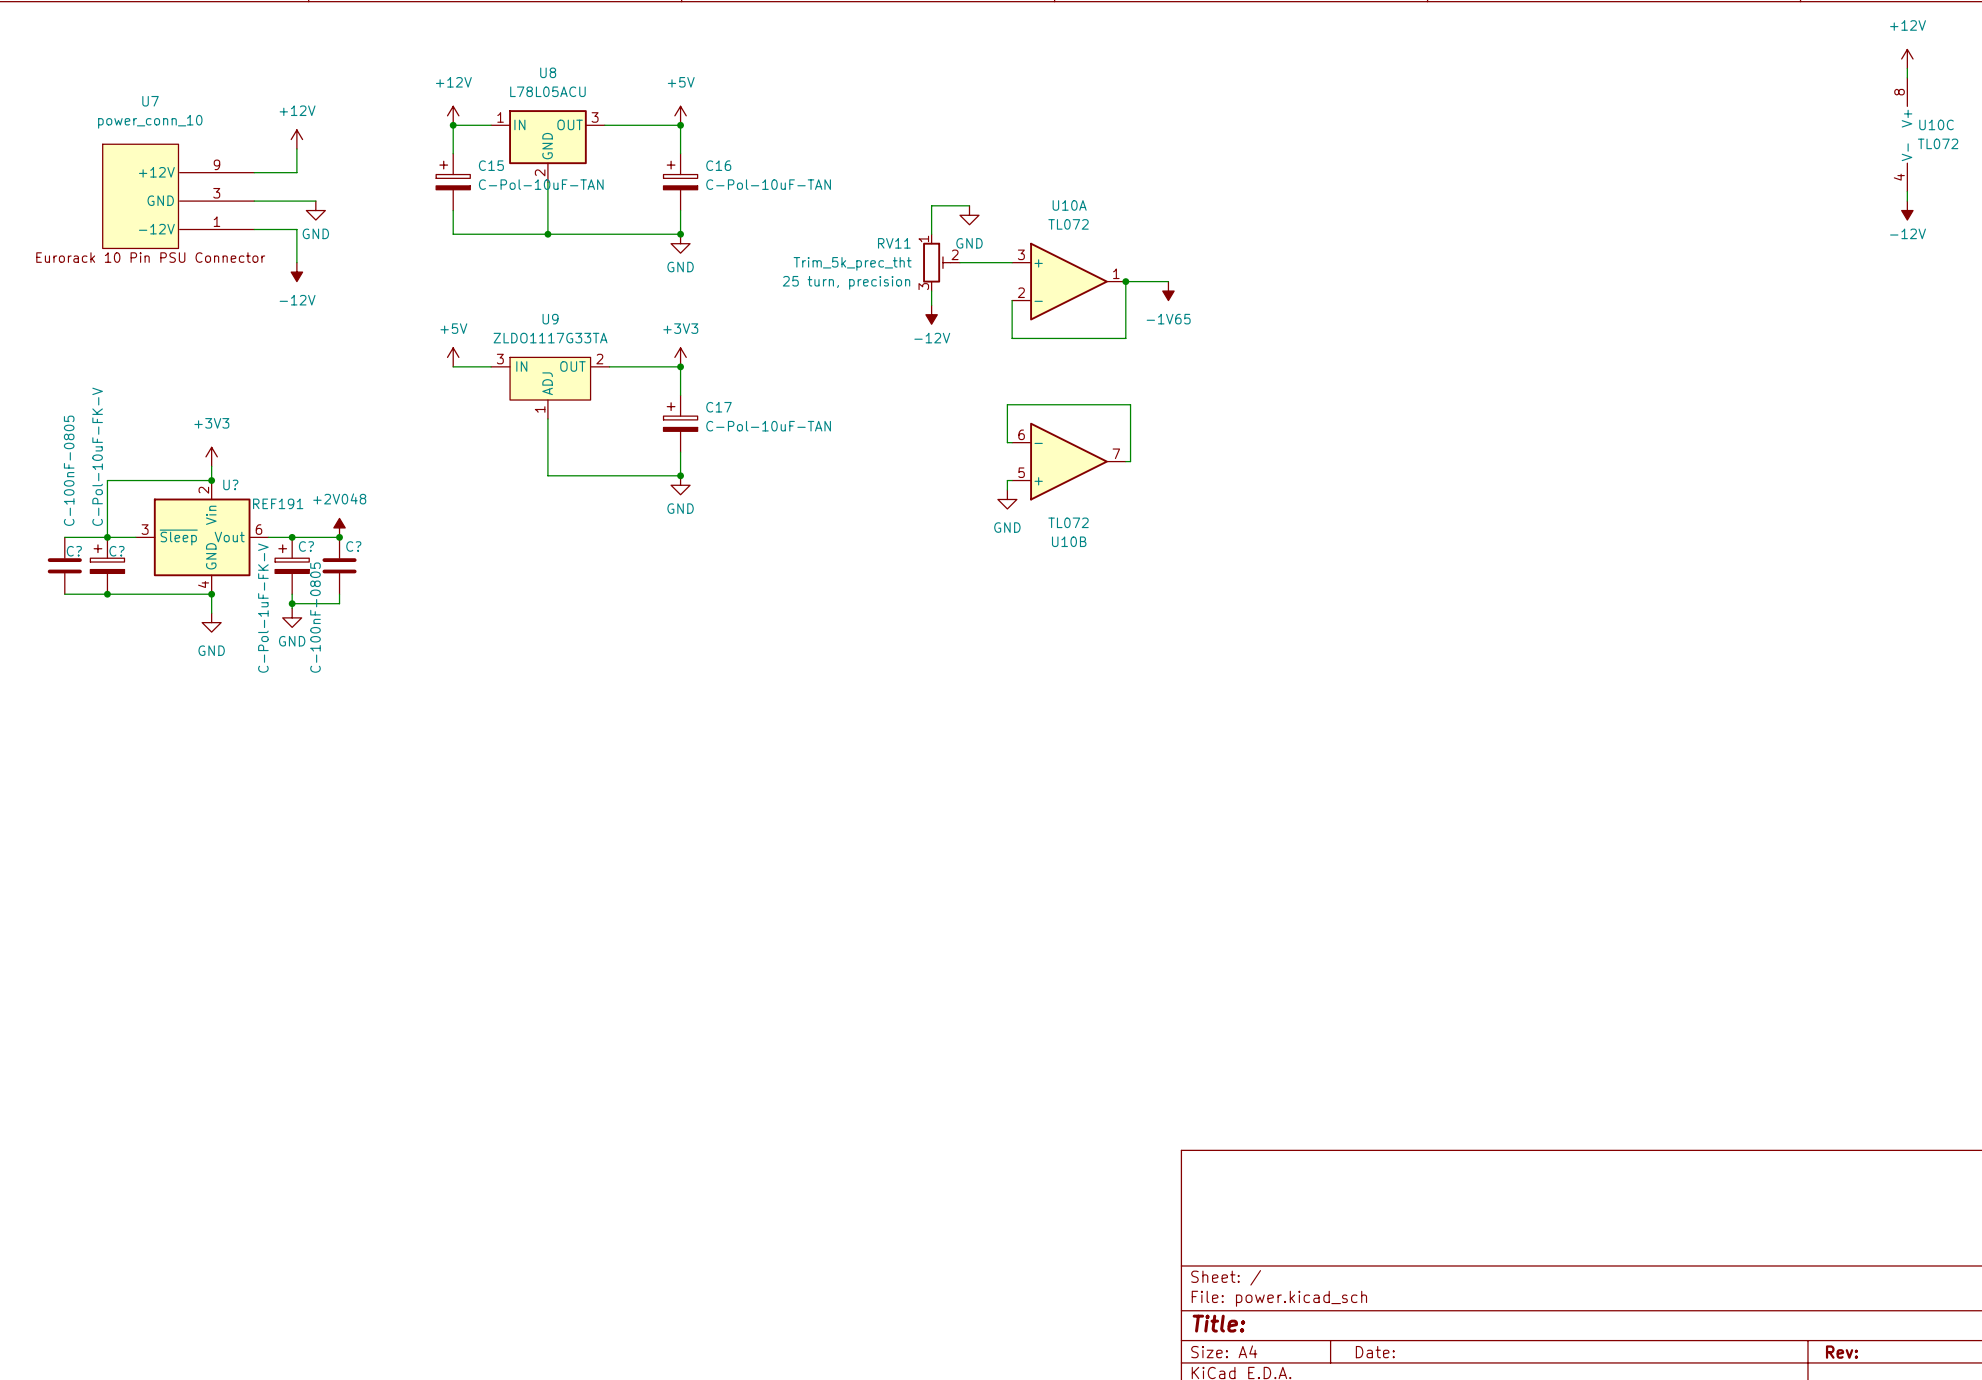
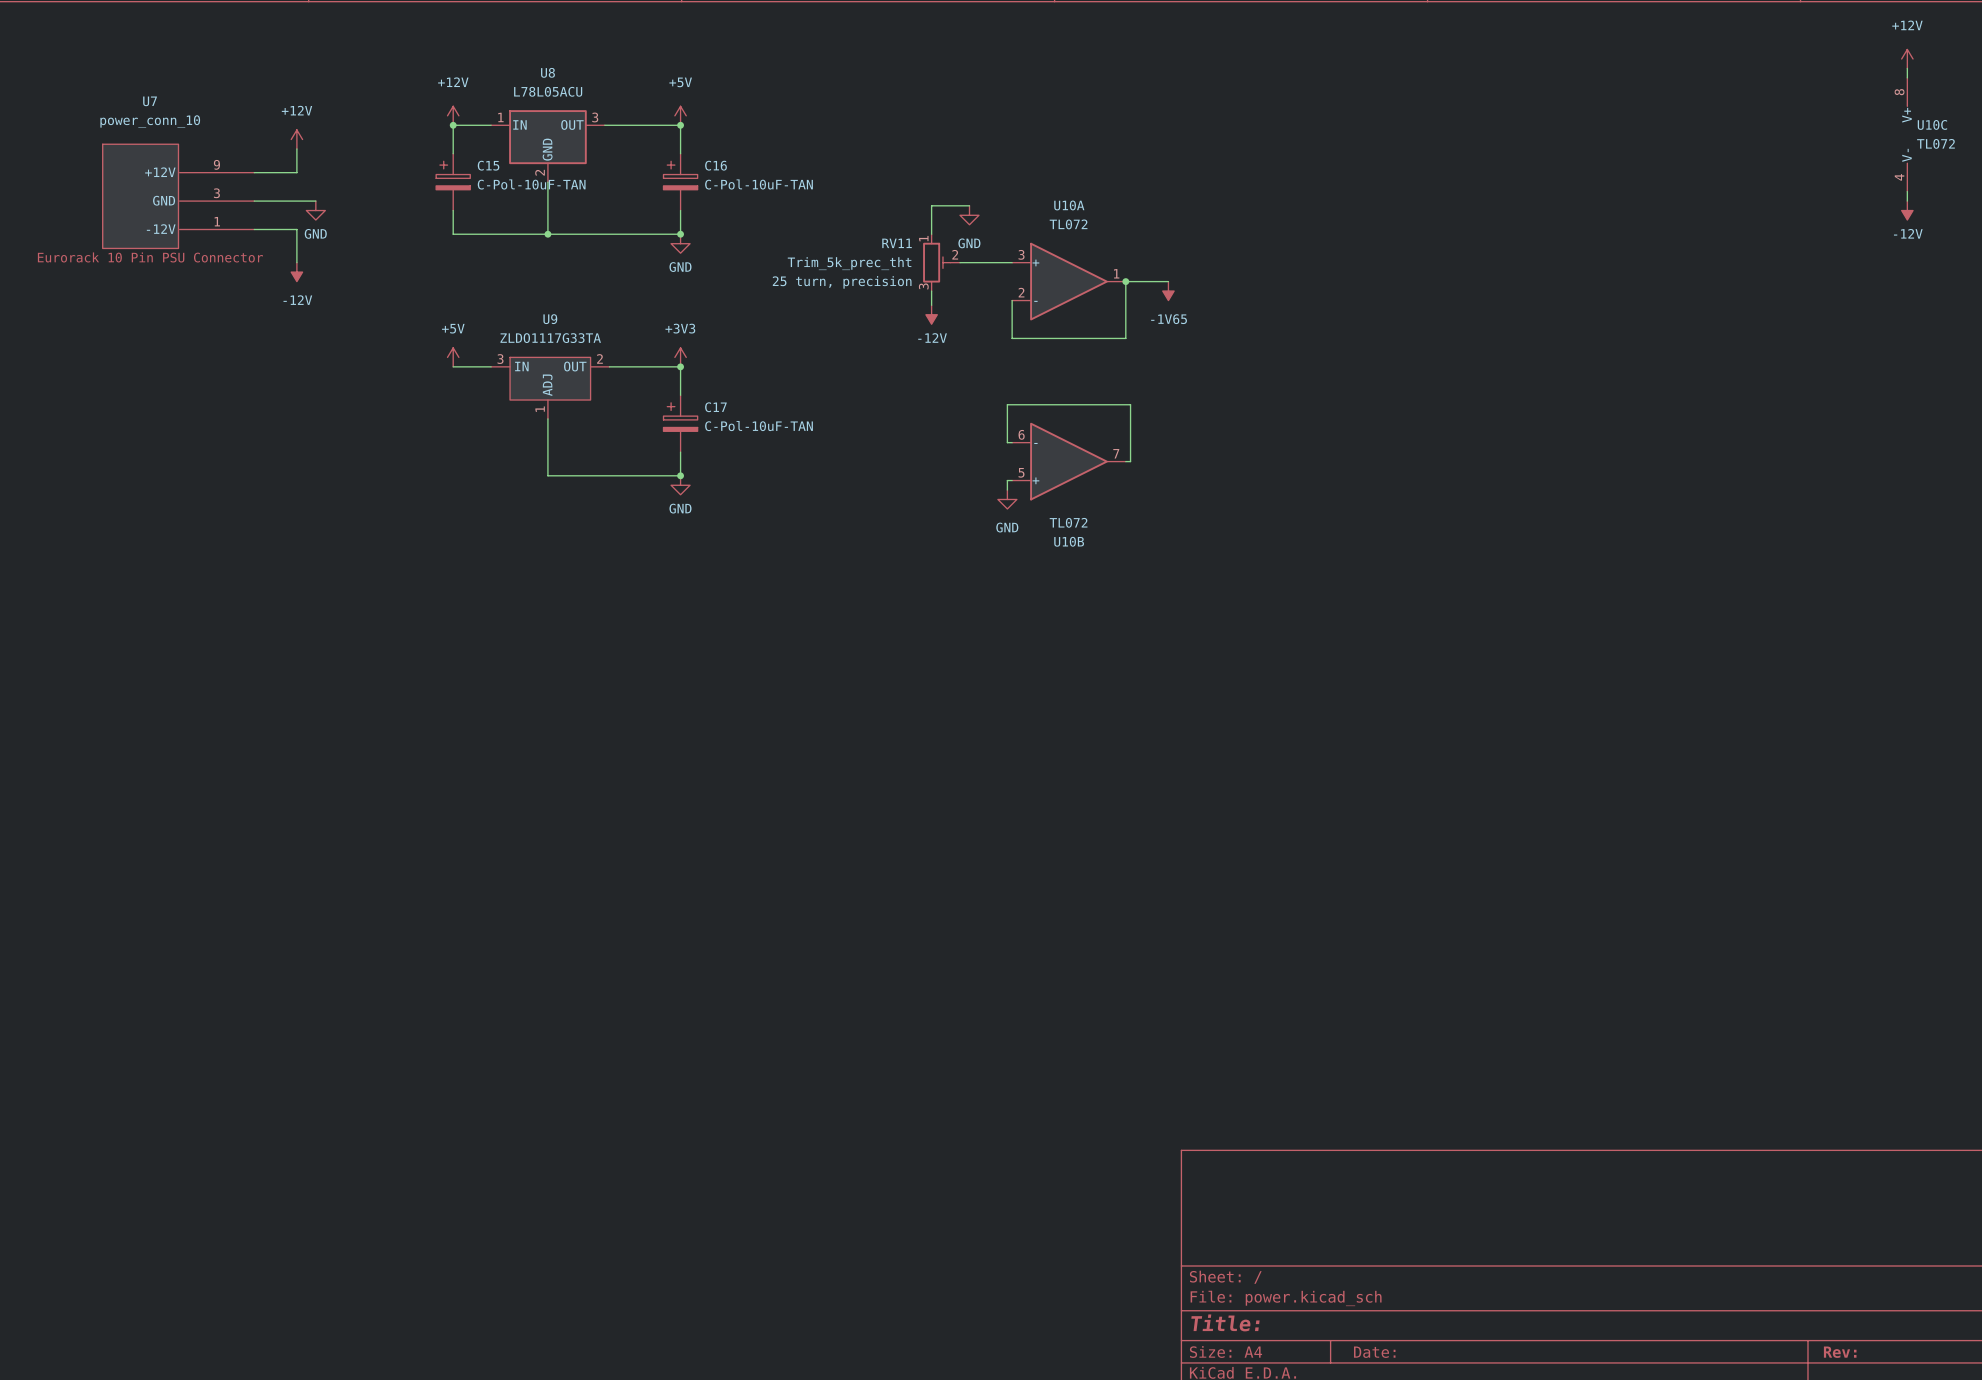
power symbol: +3V3 (211, 456) -> none
wire: (211, 466) (211, 480) (107, 480) (107, 537) -> none
junction: (211, 480) -> none
power symbol: +2V048 (339, 527) -> none
wire: (64, 537) (135, 537) -> none
junction: (107, 537) -> none
U?: REF191 (202, 537) -> none
wire: (268, 537) (339, 537) -> none
junction: (292, 537) -> none
junction: (339, 537) -> none
C?: C-100nF-0805 (64, 565) -> none
C?: C-Pol-10uF-FK-V (107, 565) -> none
C?: C-Pol-1uF-FK-V (292, 565) -> none
C?: C-100nF-0805 (339, 565) -> none
wire: (64, 594) (211, 594) (211, 613) -> none
junction: (107, 594) -> none
junction: (211, 594) -> none
wire: (292, 594) (292, 608) -> none
wire: (339, 594) (339, 603) (292, 603) -> none
junction: (292, 603) -> none
power symbol: GND (292, 617) -> none
power symbol: GND (211, 622) -> none

